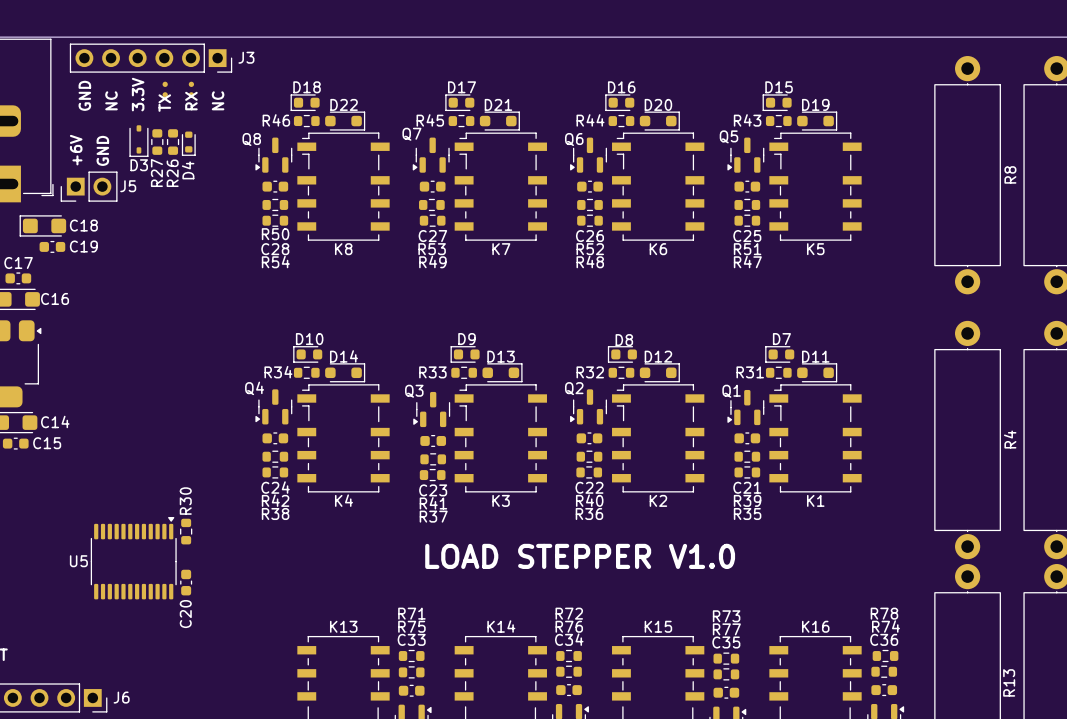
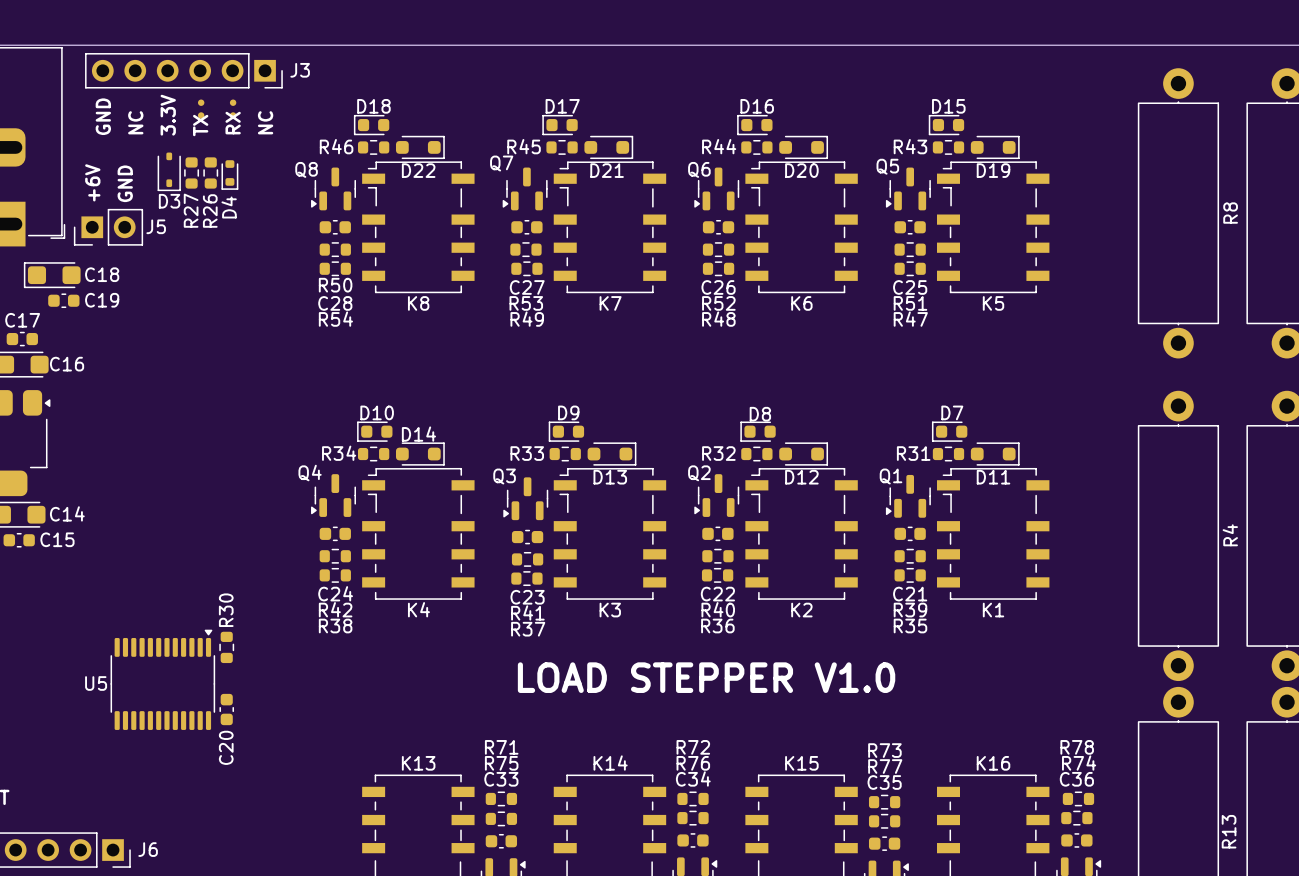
D22 name position: D22 (344, 104) -> D22 (418, 170)
D21 name position: D21 (498, 104) -> D21 (607, 170)
D20 name position: D20 (658, 104) -> D20 (801, 170)
D19 name position: D19 (815, 104) -> D19 (993, 170)
D13 name position: D13 (501, 356) -> D13 (610, 477)
D12 name position: D12 (658, 356) -> D12 (801, 477)
D11 name position: D11 (815, 356) -> D11 (993, 477)

